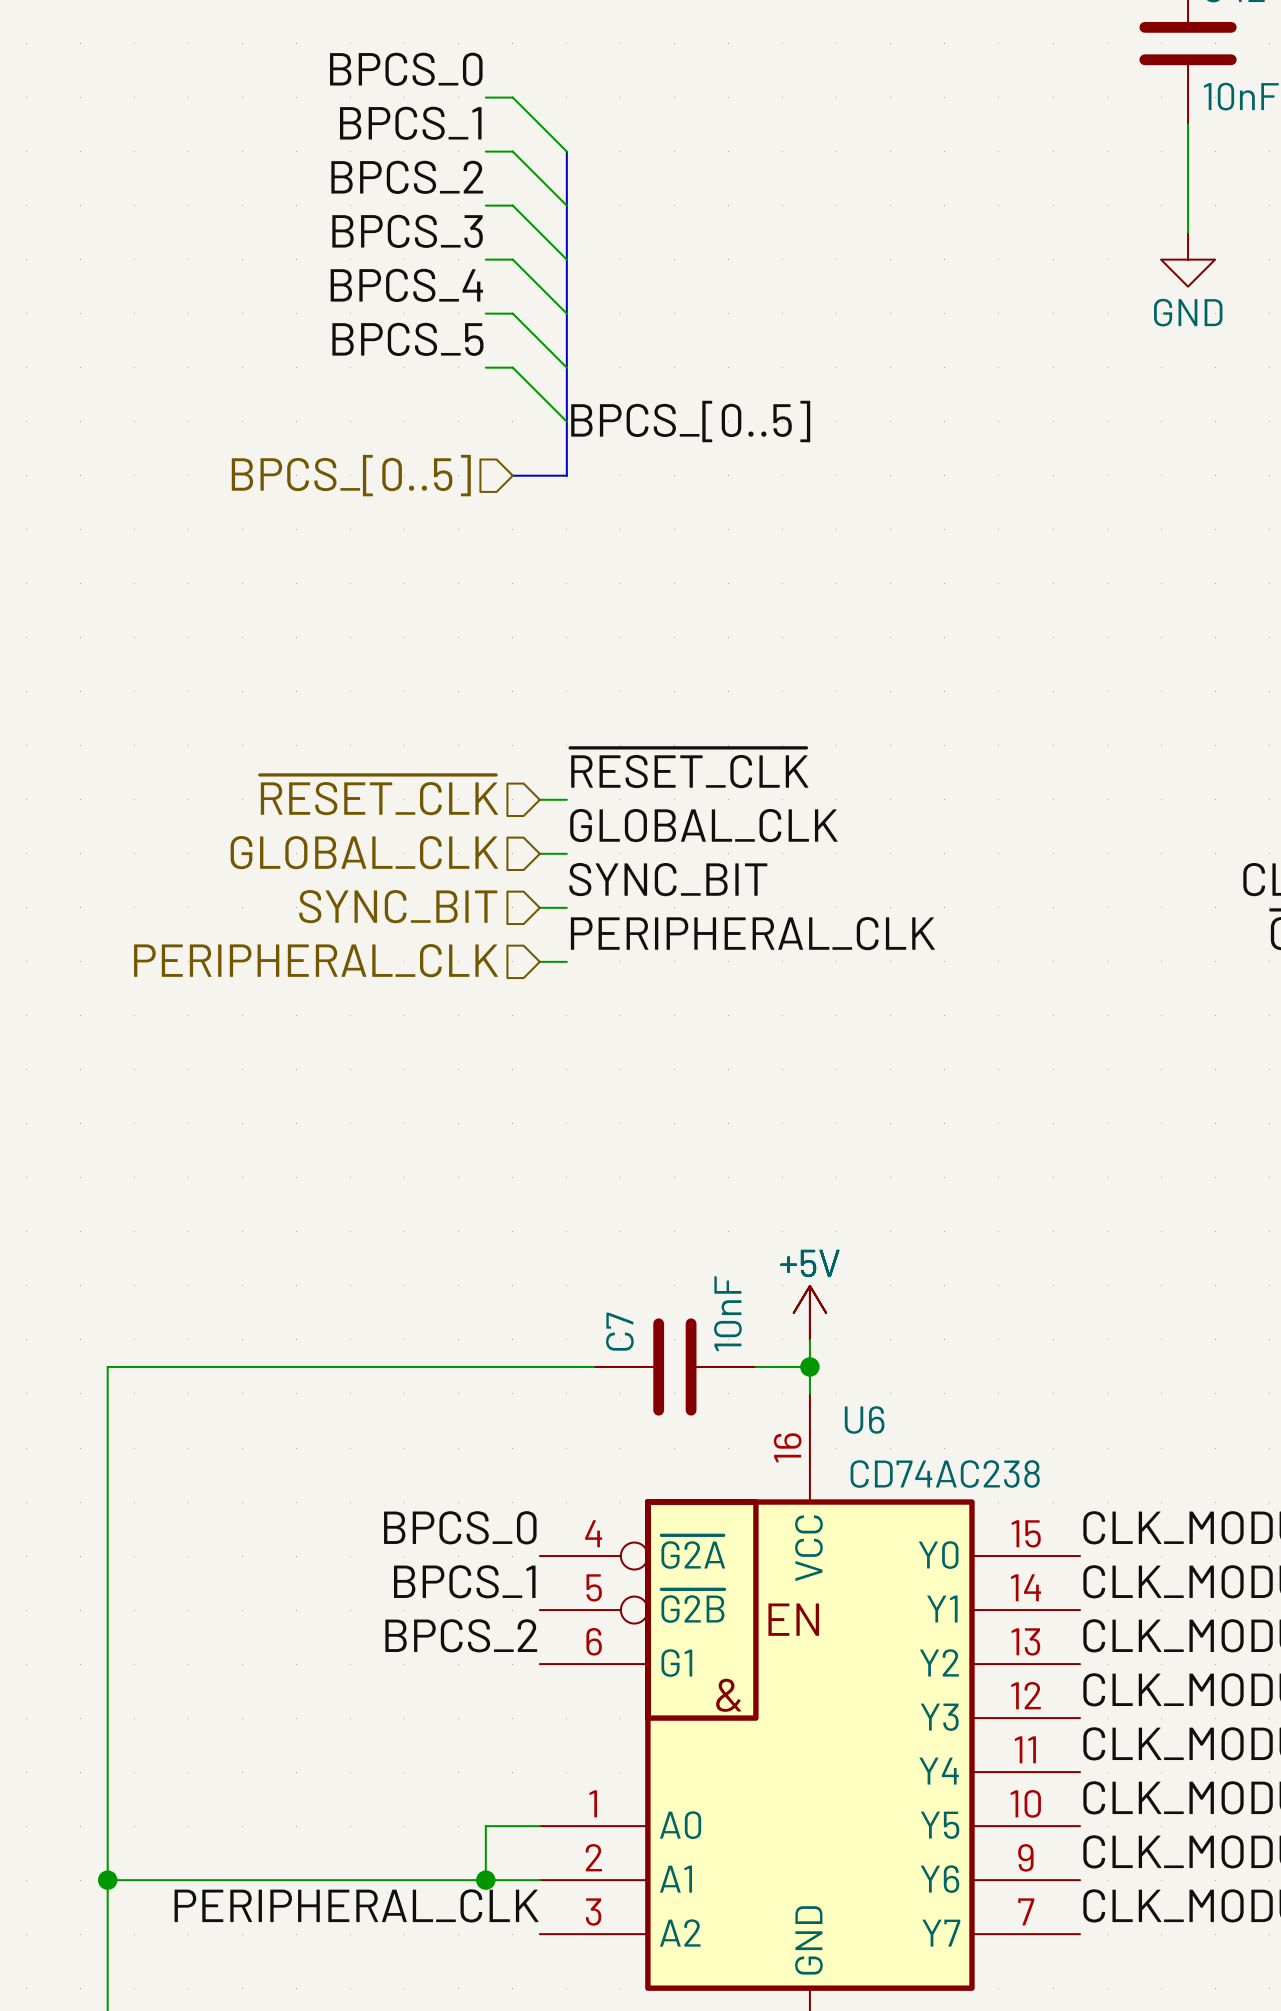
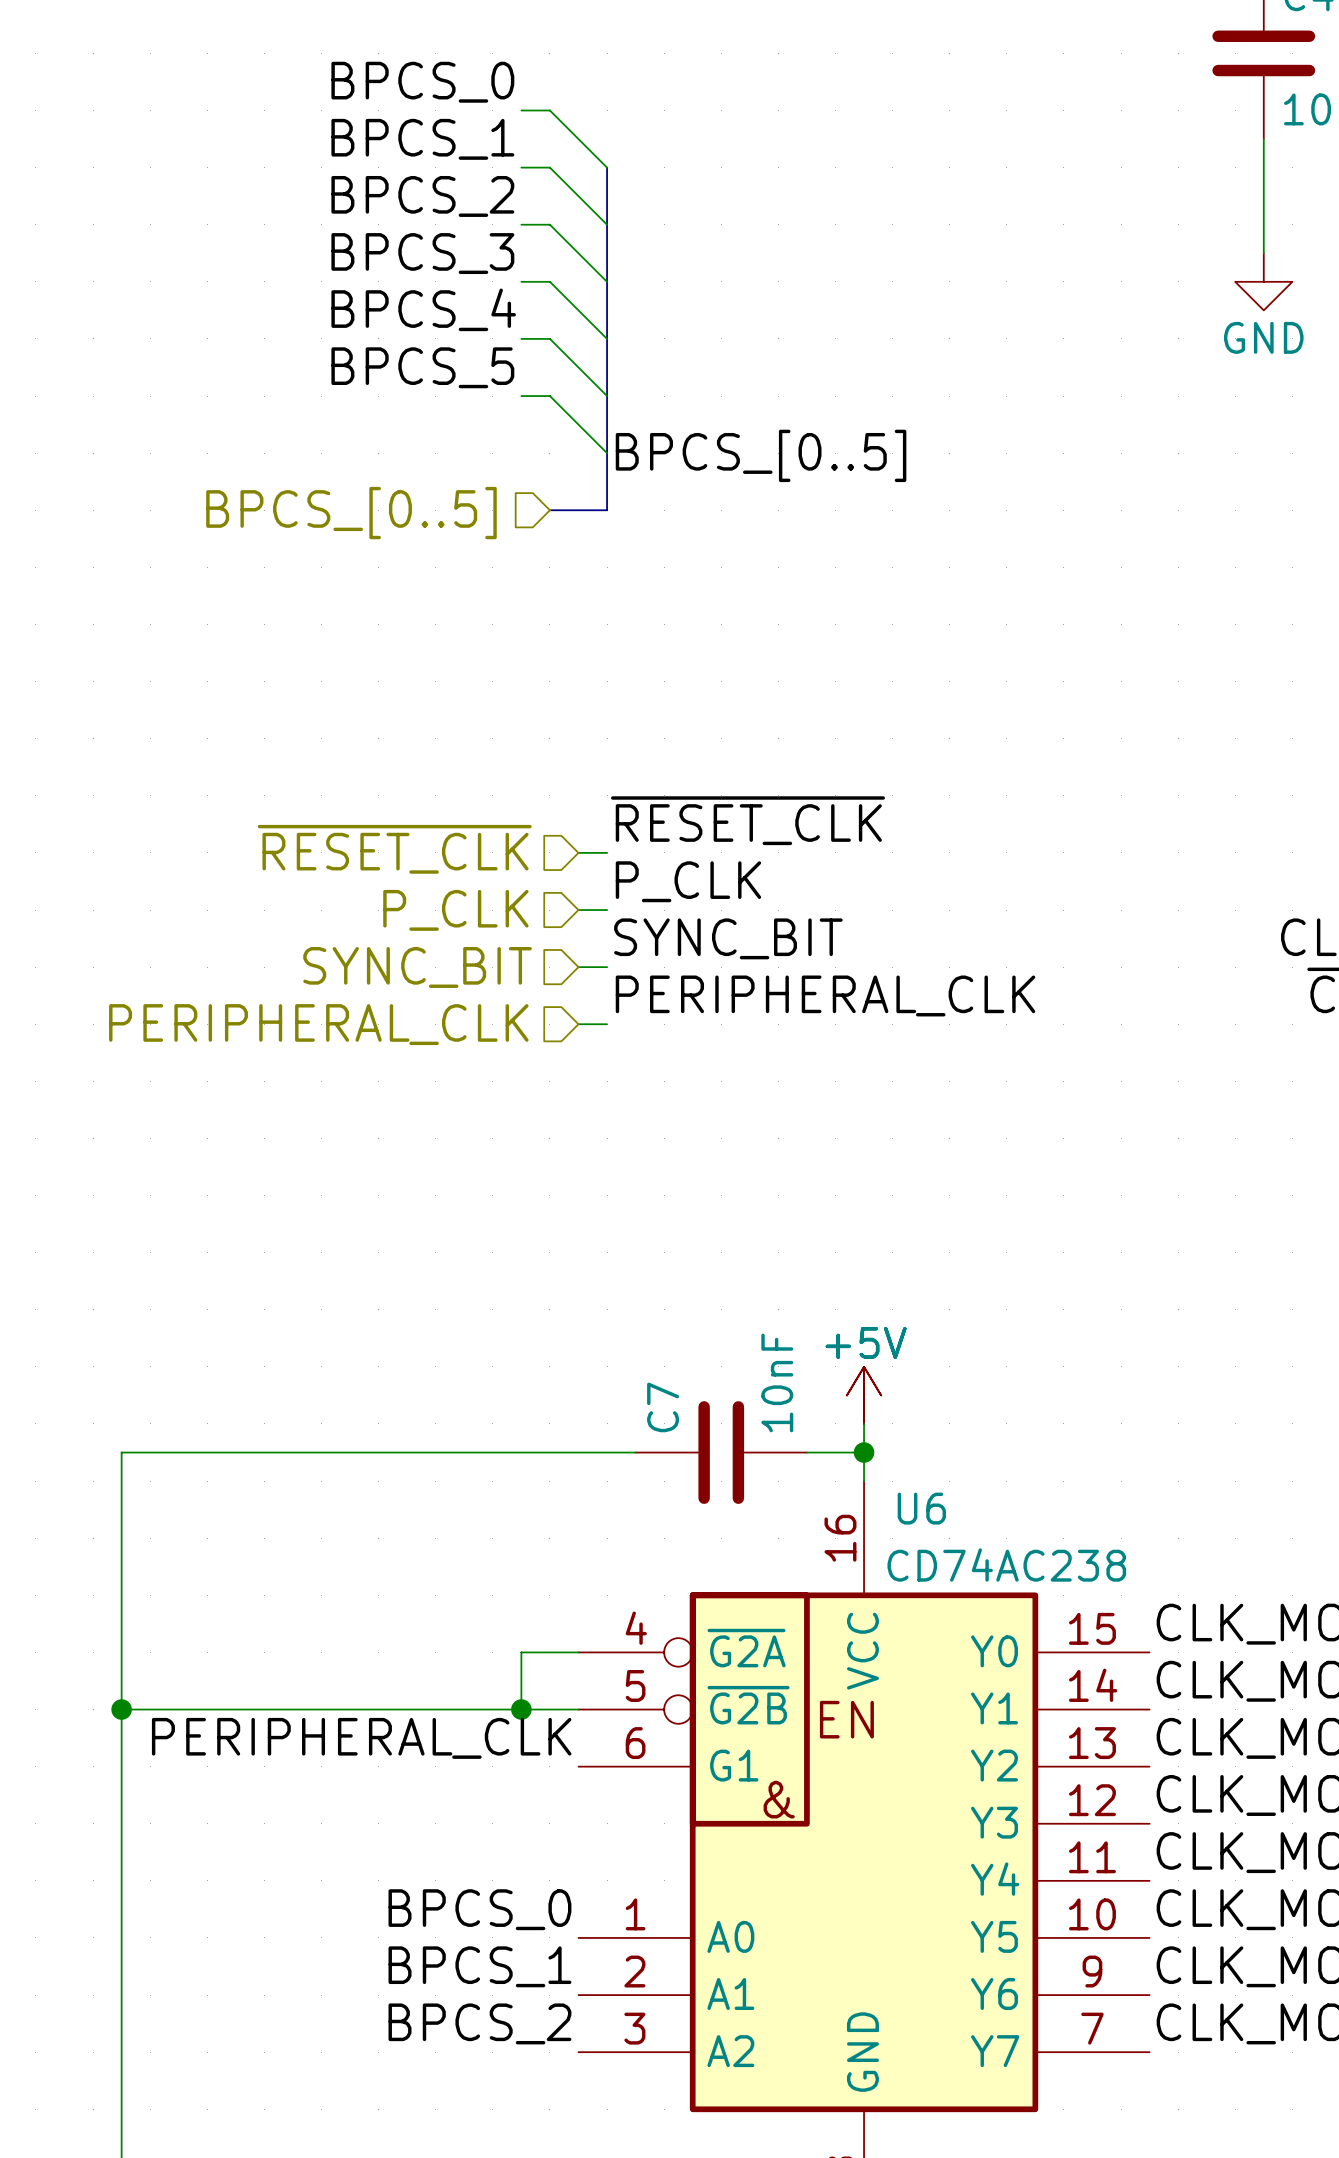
label: GLOBAL_CLK (703, 825) -> P_CLK (688, 881)
hierarchical label: GLOBAL_CLK (364, 852) -> P_CLK (455, 910)
label position: BPCS_0 (460, 1527) -> BPCS_0 (479, 1909)
label position: BPCS_1 (464, 1581) -> BPCS_1 (479, 1966)
junction: none -> (121, 1709)
junction: none -> (521, 1709)
label: BPCS_2 (461, 1635) -> PERIPHERAL_CLK (361, 1738)
wire: (539, 1826) (485, 1826) (485, 1880) -> (578, 1652) (521, 1652) (521, 1709)
wire: (107, 1880) (539, 1880) -> (121, 1709) (578, 1709)
junction: (107, 1880) -> none
junction: (485, 1880) -> none
label: PERIPHERAL_CLK (356, 1905) -> BPCS_2 (479, 2023)

